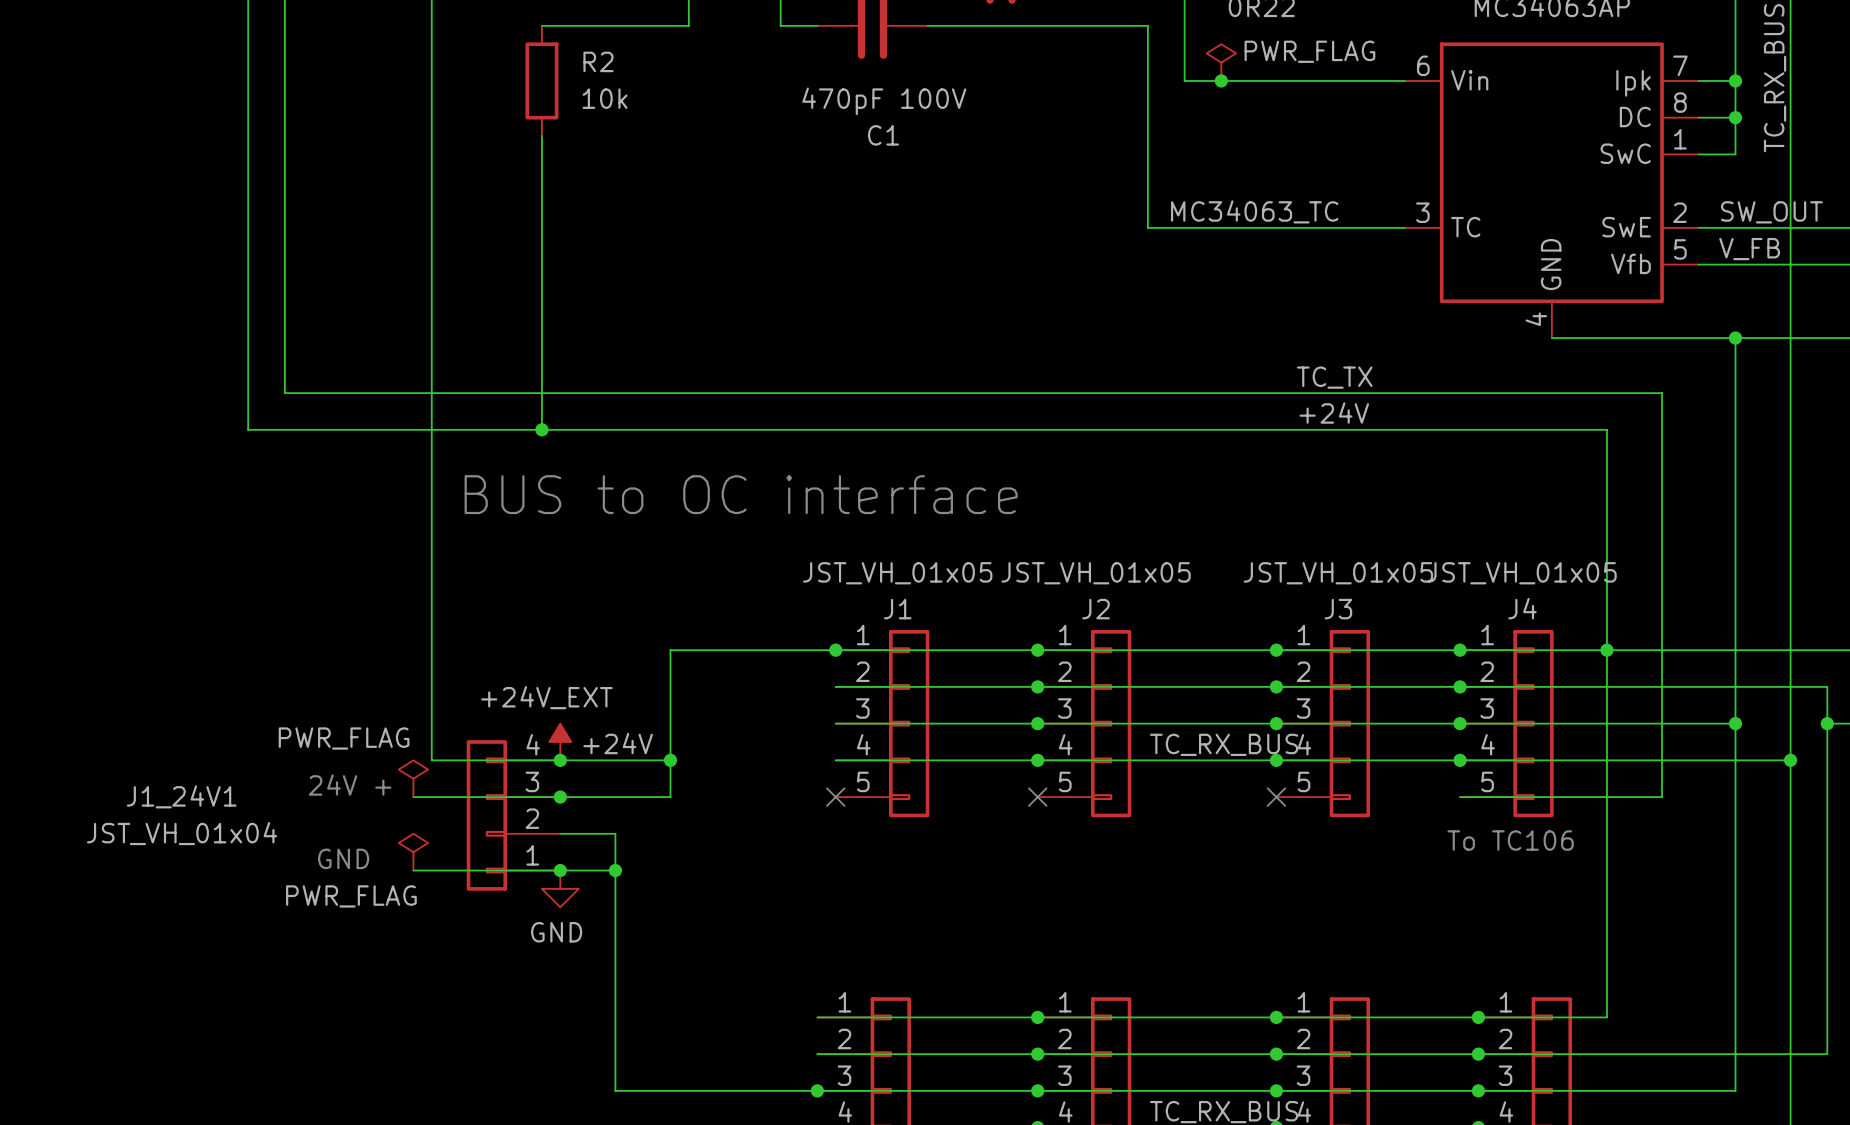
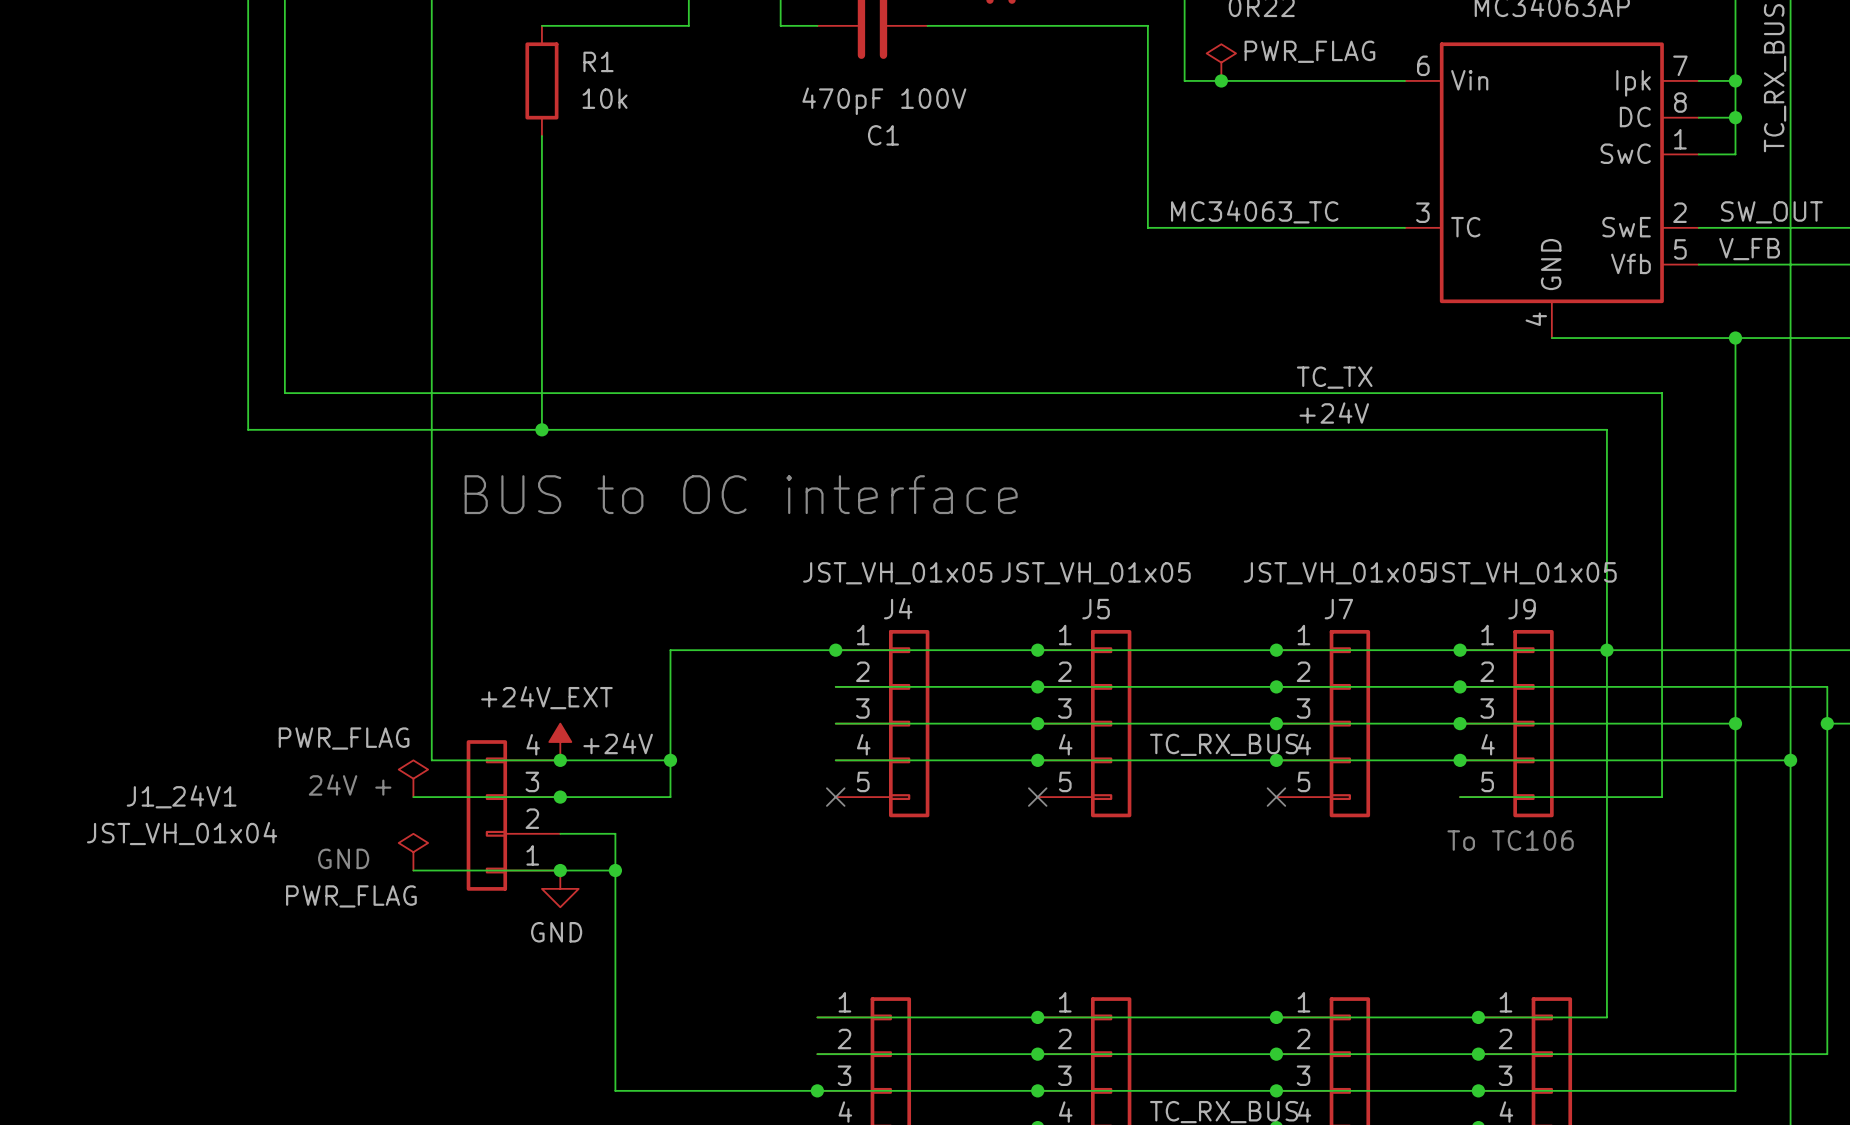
R2 name: R2 (598, 61) -> R1 (598, 61)
J4 name: J4 (1522, 608) -> J9 (1522, 609)
J1 name: J1 (897, 609) -> J4 (898, 608)
J2 name: J2 (1096, 609) -> J5 (1096, 609)
J3 name: J3 (1338, 609) -> J7 (1338, 609)

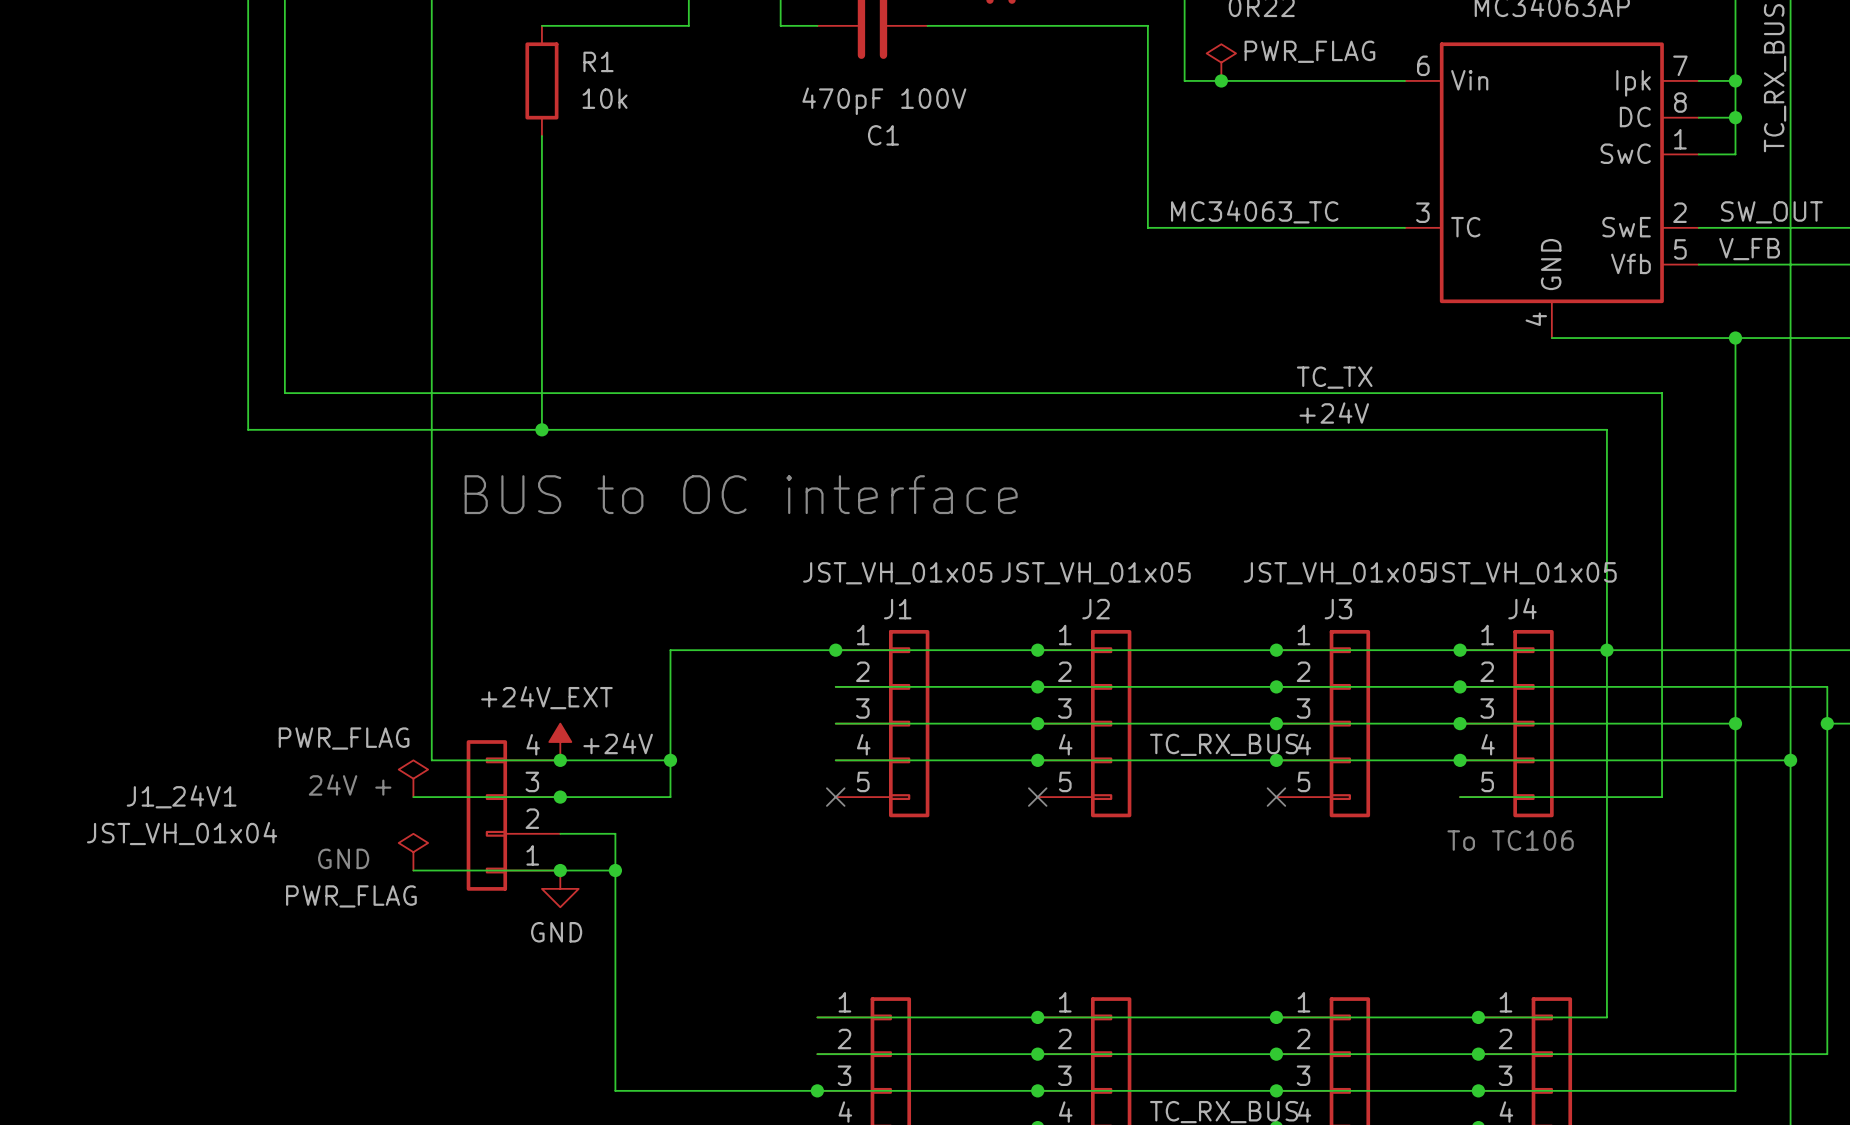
J4 name: J4 (898, 608) -> J1 (897, 609)
J5 name: J5 (1096, 609) -> J2 (1096, 609)
J7 name: J7 (1338, 609) -> J3 (1338, 609)
J9 name: J9 (1522, 609) -> J4 (1522, 608)

